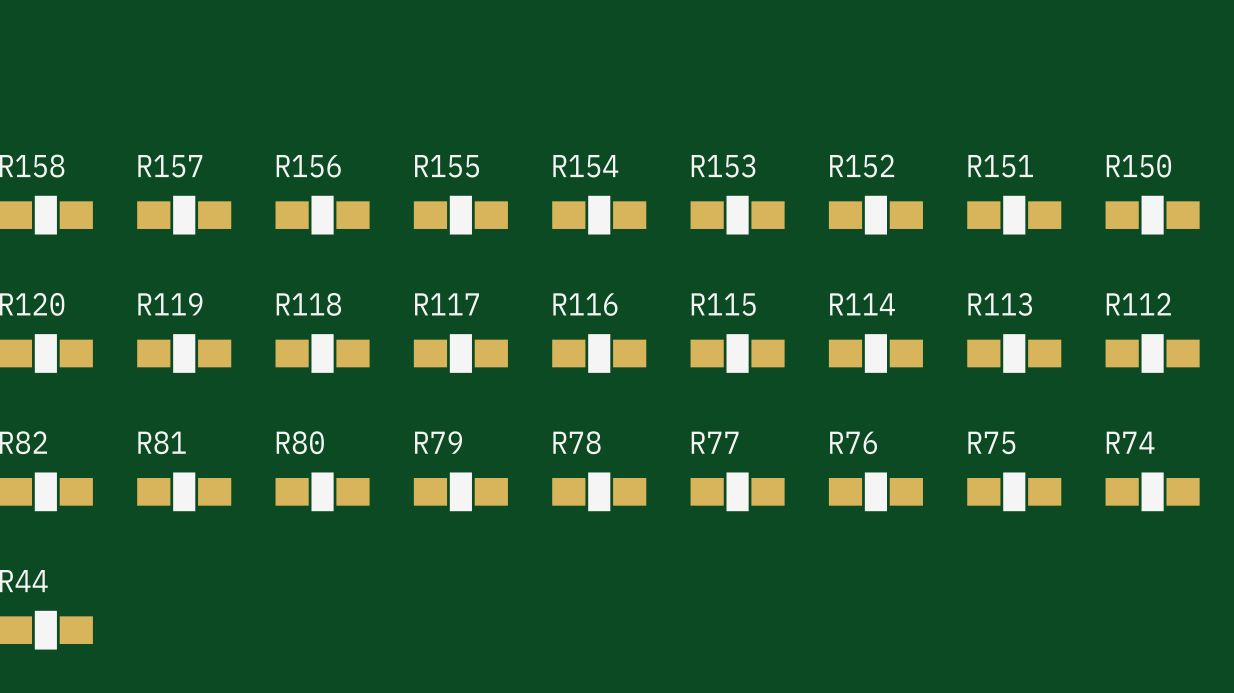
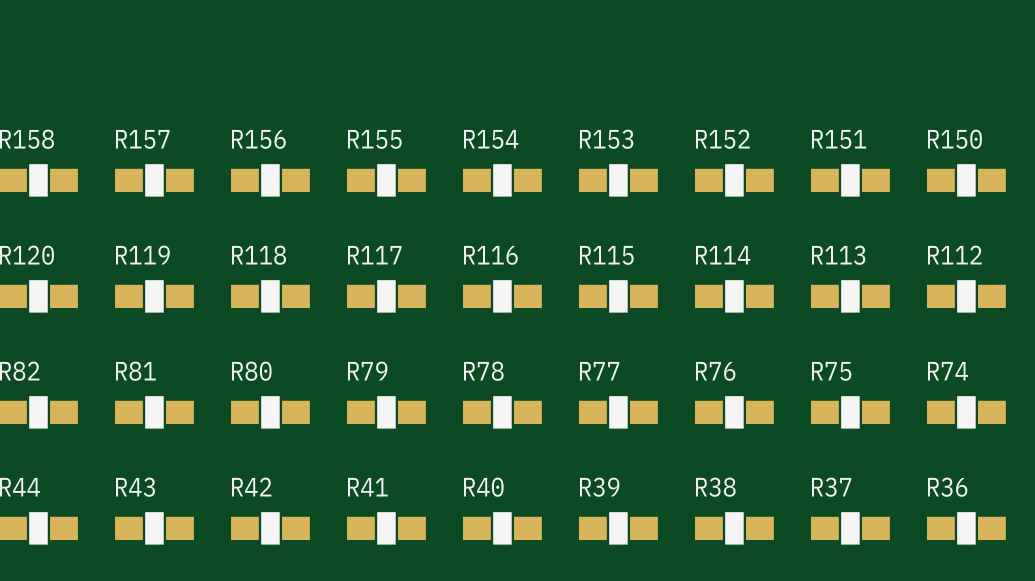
R43: none -> (154, 528)
R42: none -> (270, 528)
R41: none -> (386, 528)
R40: none -> (502, 528)
R39: none -> (618, 528)
R38: none -> (734, 528)
R37: none -> (850, 528)
R36: none -> (966, 528)

